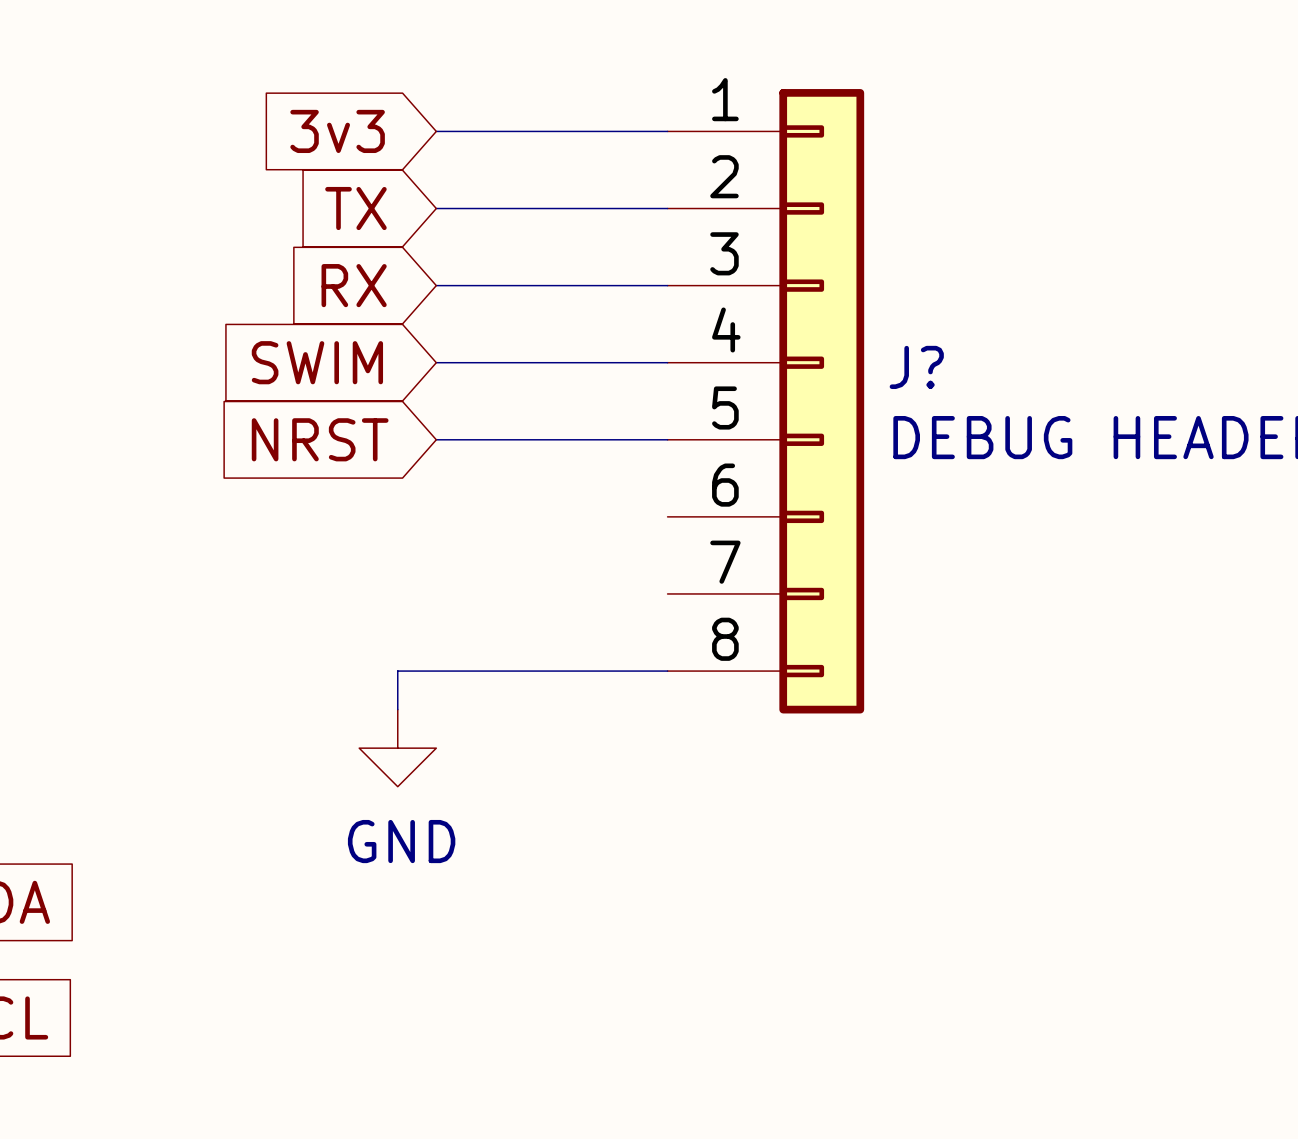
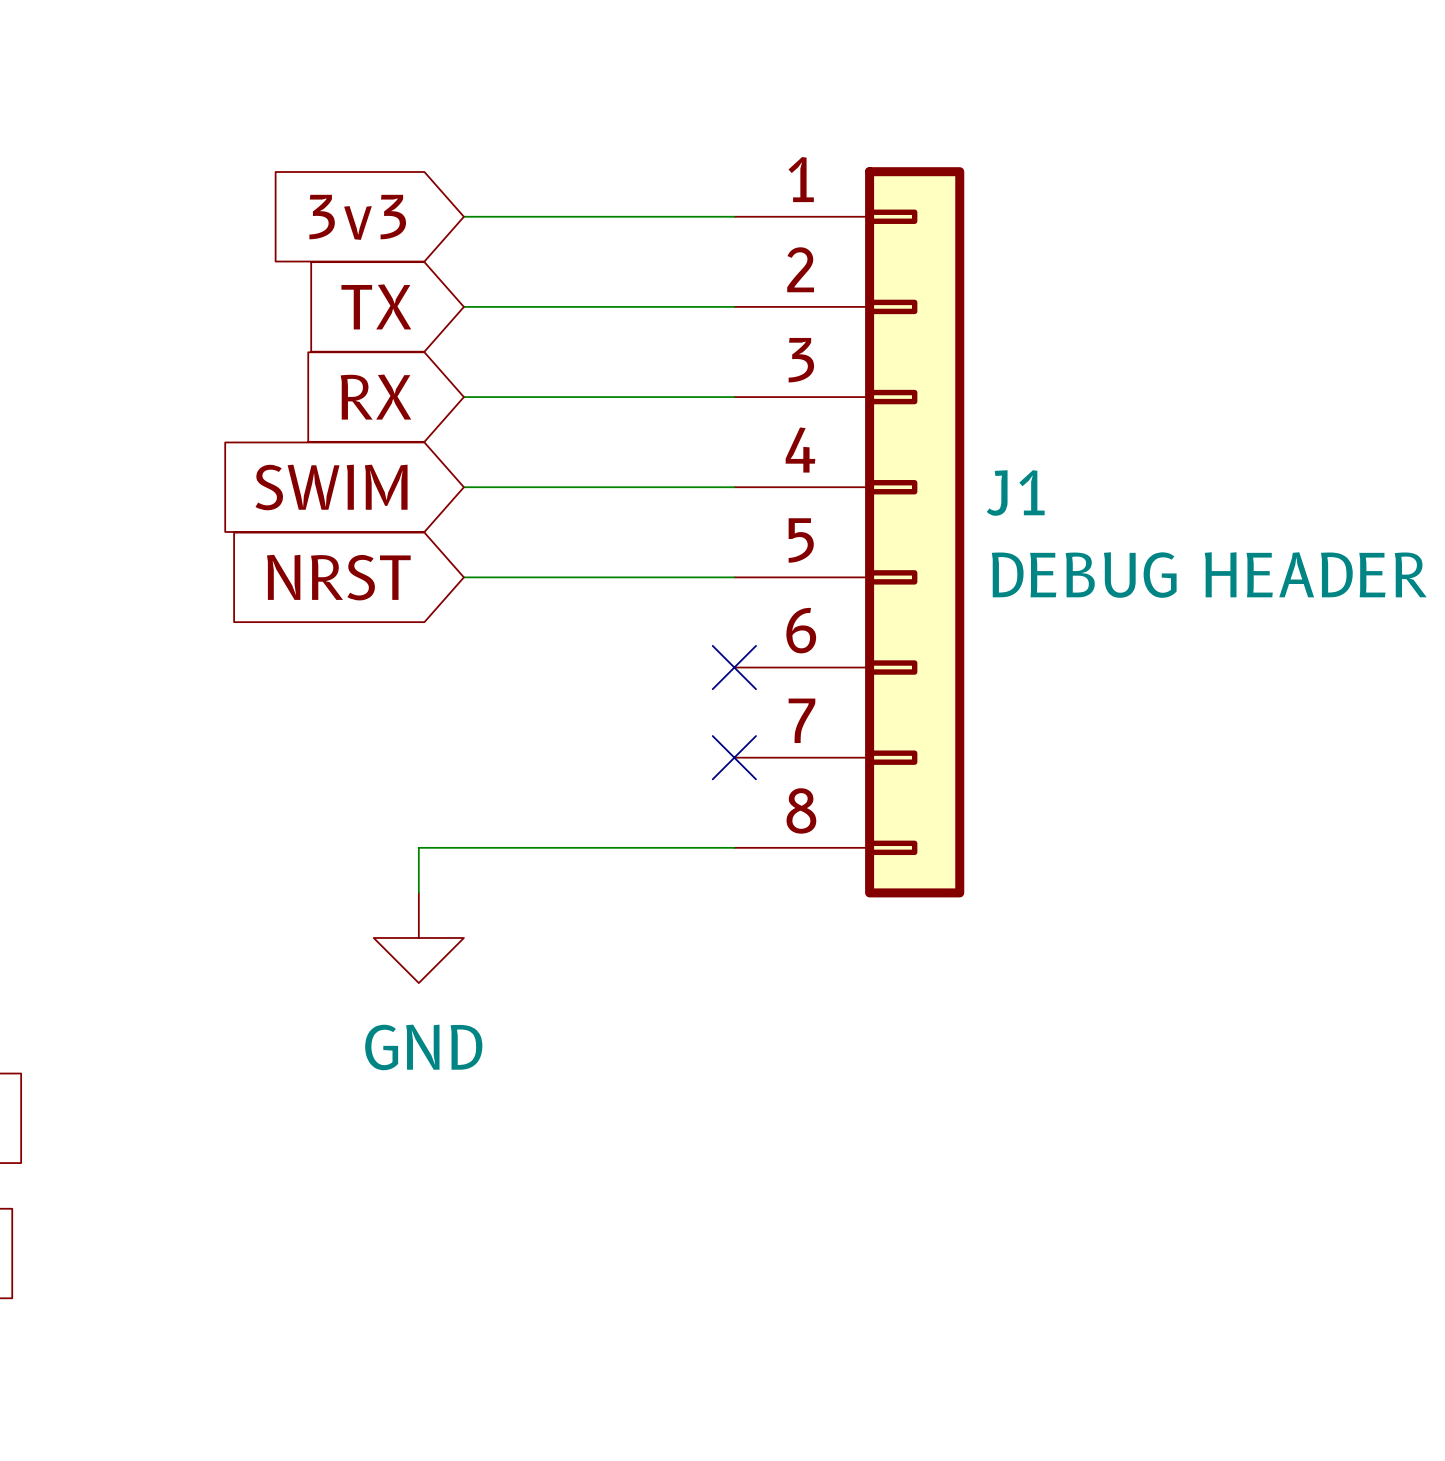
J? name: J? (916, 367) -> J1 (1015, 493)
no-connect mark: none -> (734, 667)
no-connect mark: none -> (734, 757)

